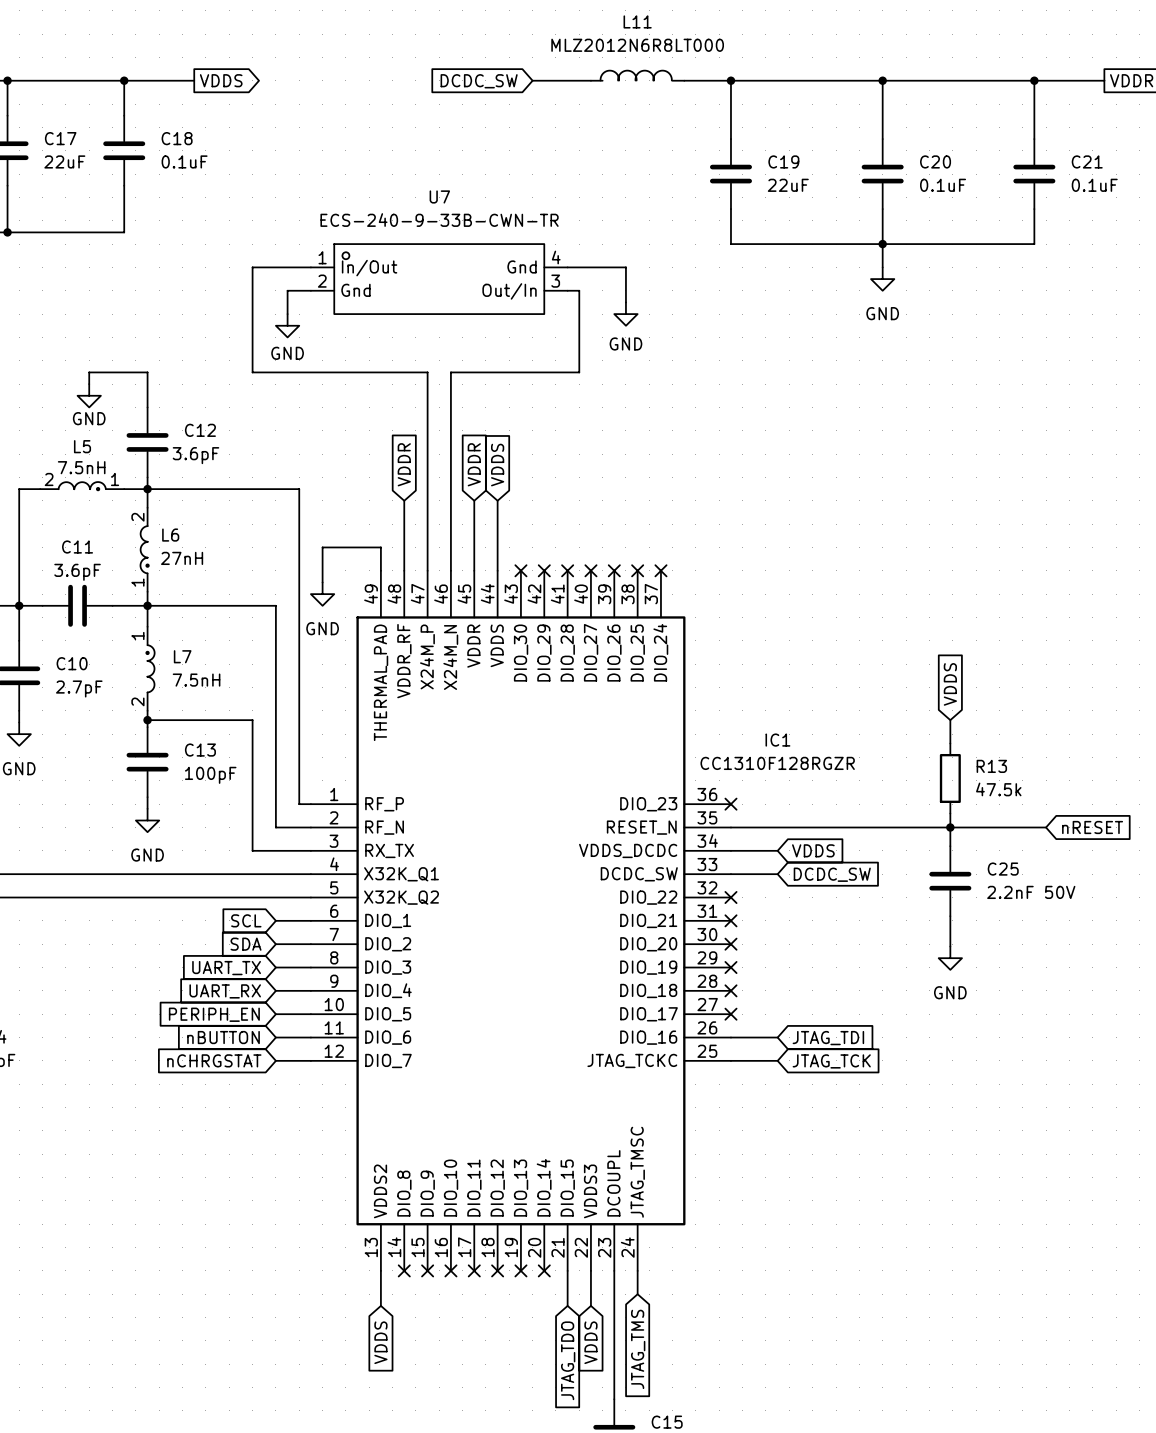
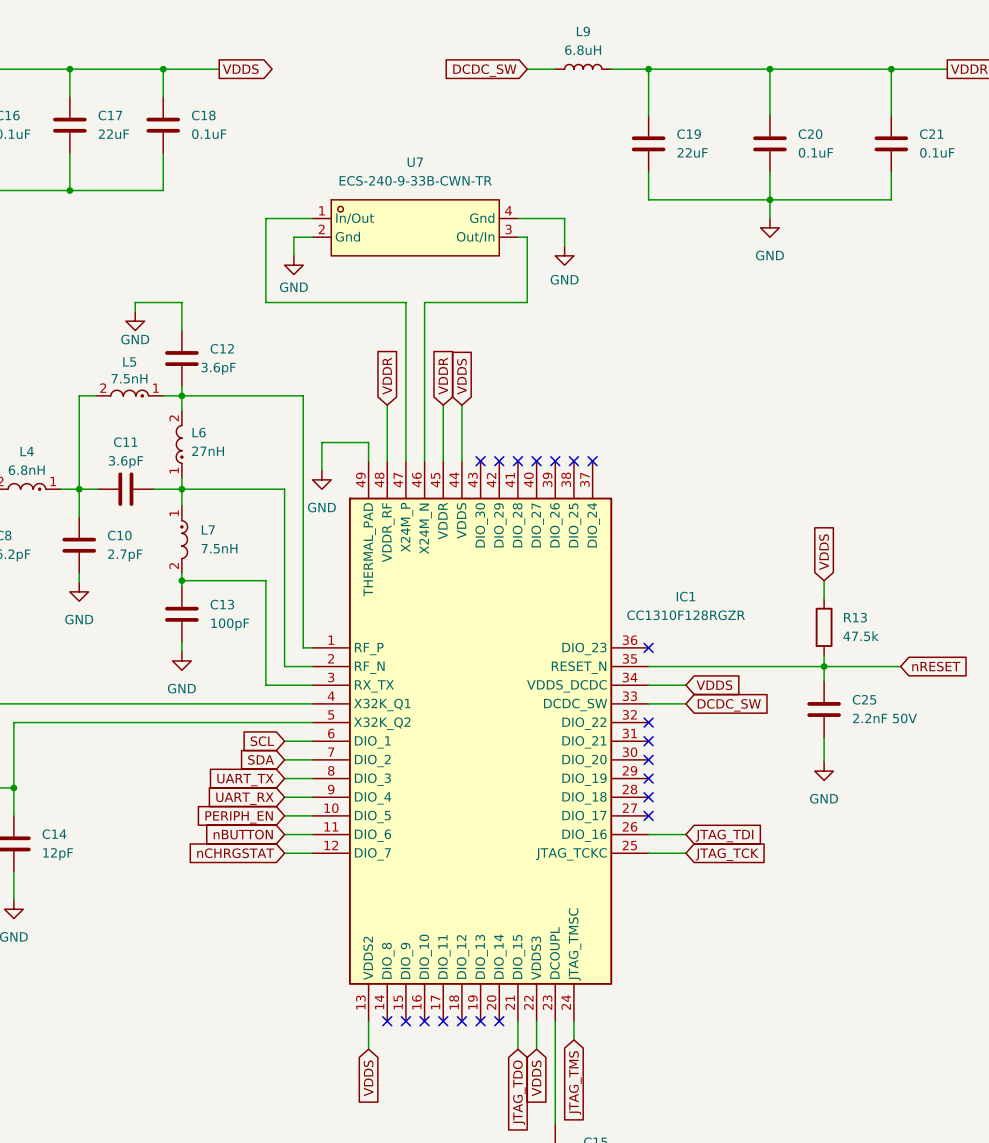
L11: MLZ2012N6R8LT000 (637, 75) -> none
L9: none -> 6.8uH (583, 66)
wire: (532, 80) (579, 80) -> none
wire: none -> (536, 69) (555, 69)
global label position: DCDC_SW (479, 81) -> DCDC_SW (484, 70)

